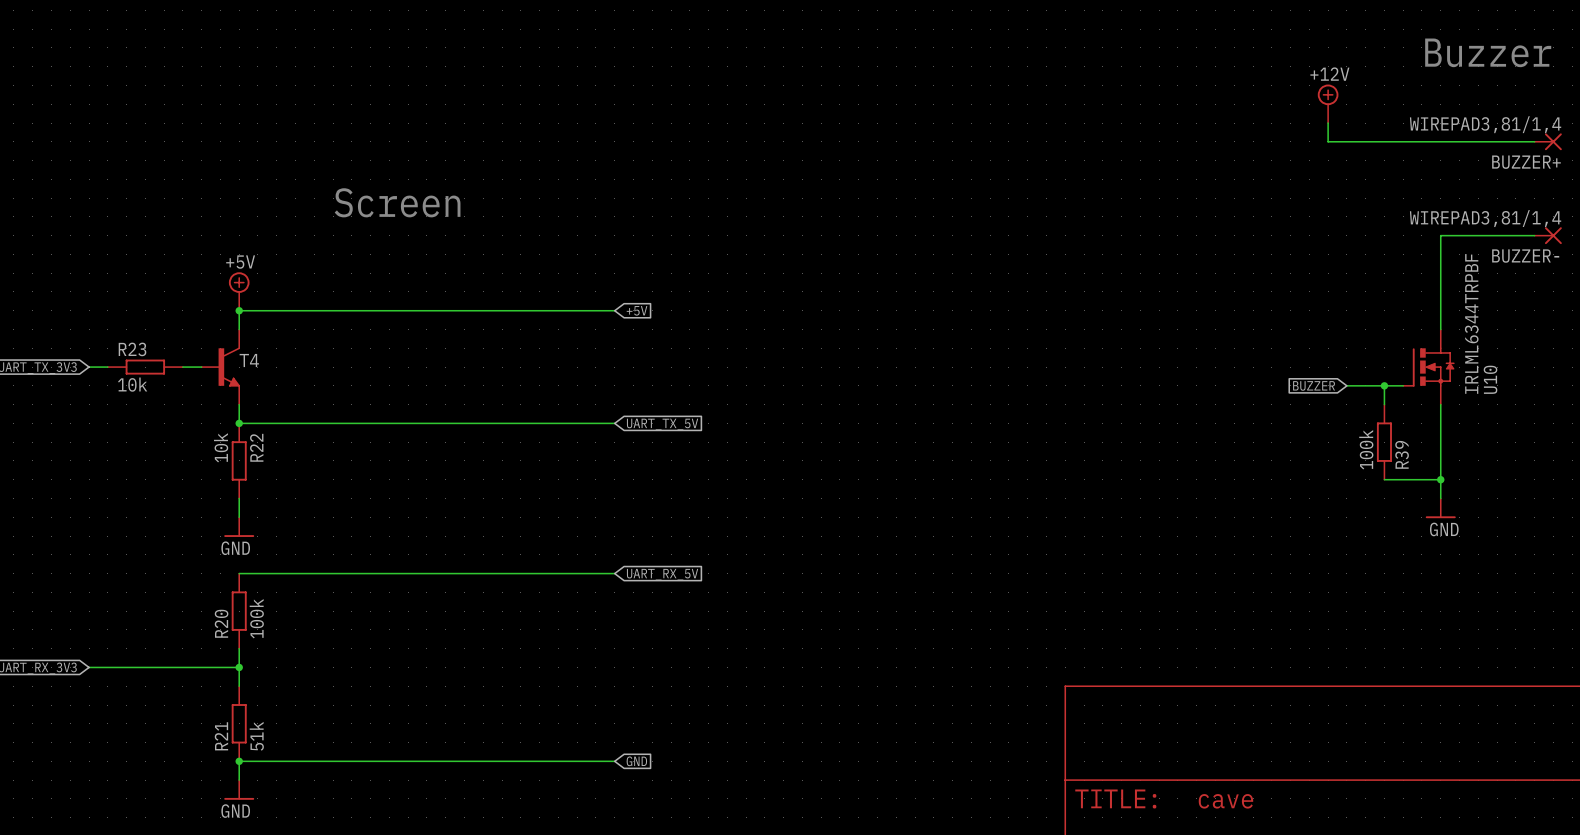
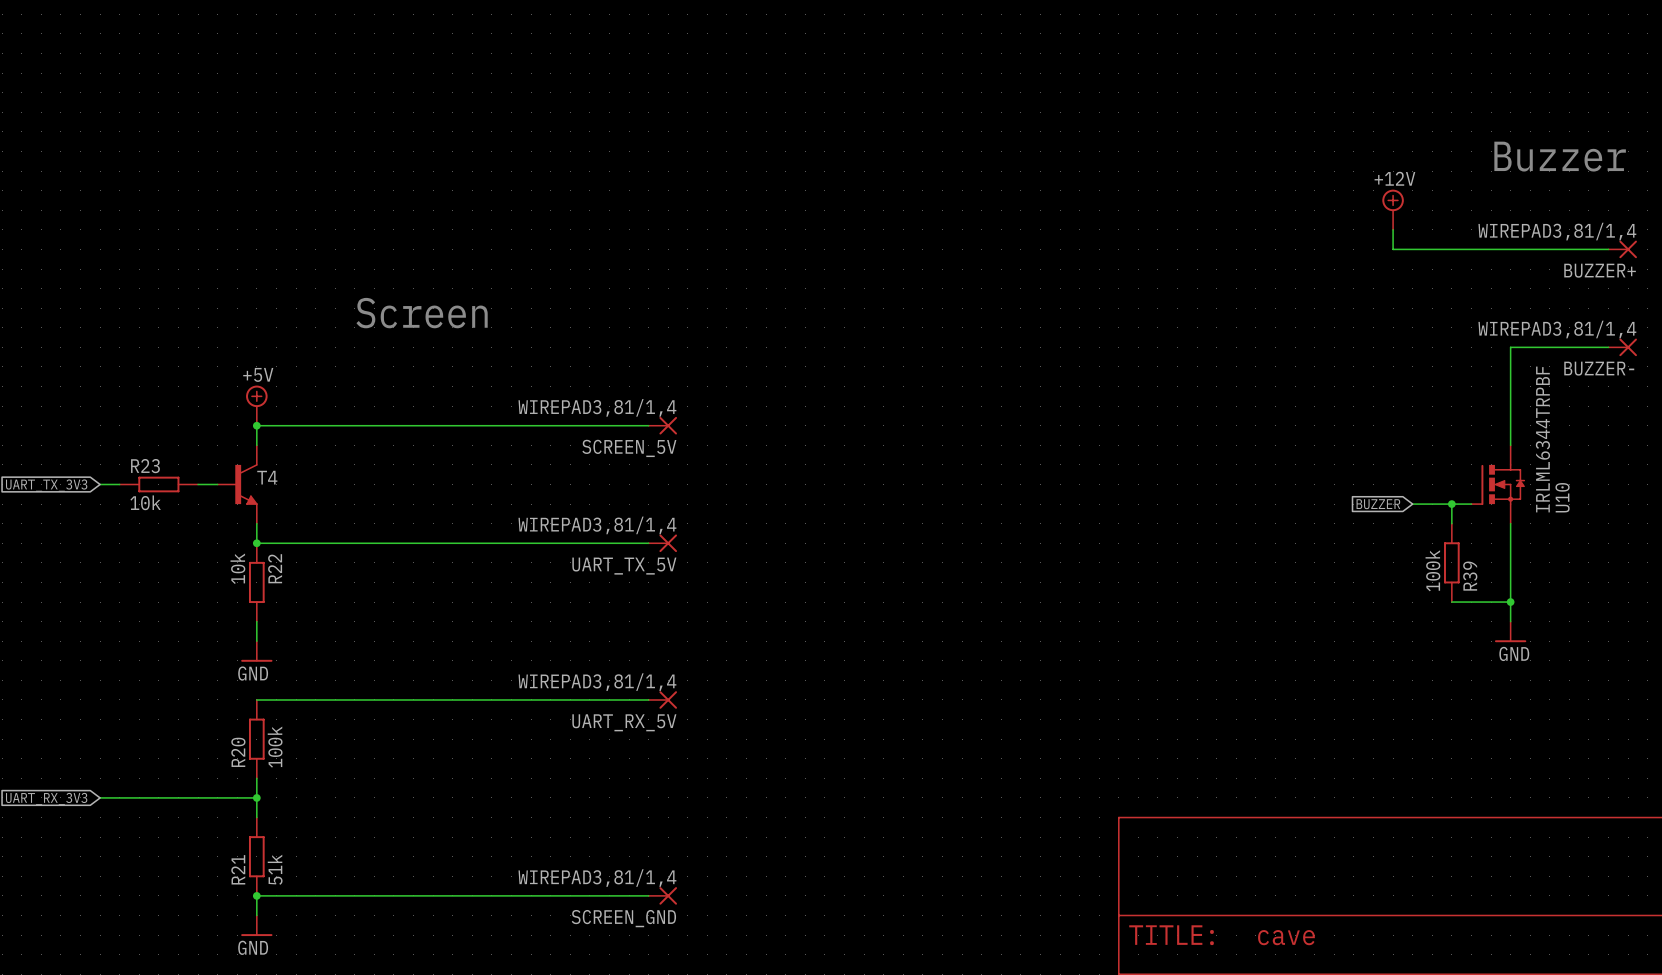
SCREEN_5V: none -> WIREPAD3,81/1,4 (662, 425)
global label: +5V (637, 310) -> none
UART_TX_5V: none -> WIREPAD3,81/1,4 (662, 543)
global label: UART_TX_5V (662, 424) -> none
UART_RX_5V: none -> WIREPAD3,81/1,4 (662, 699)
global label: UART_RX_5V (662, 574) -> none
SCREEN_GND: none -> WIREPAD3,81/1,4 (662, 895)
global label: GND (636, 761) -> none

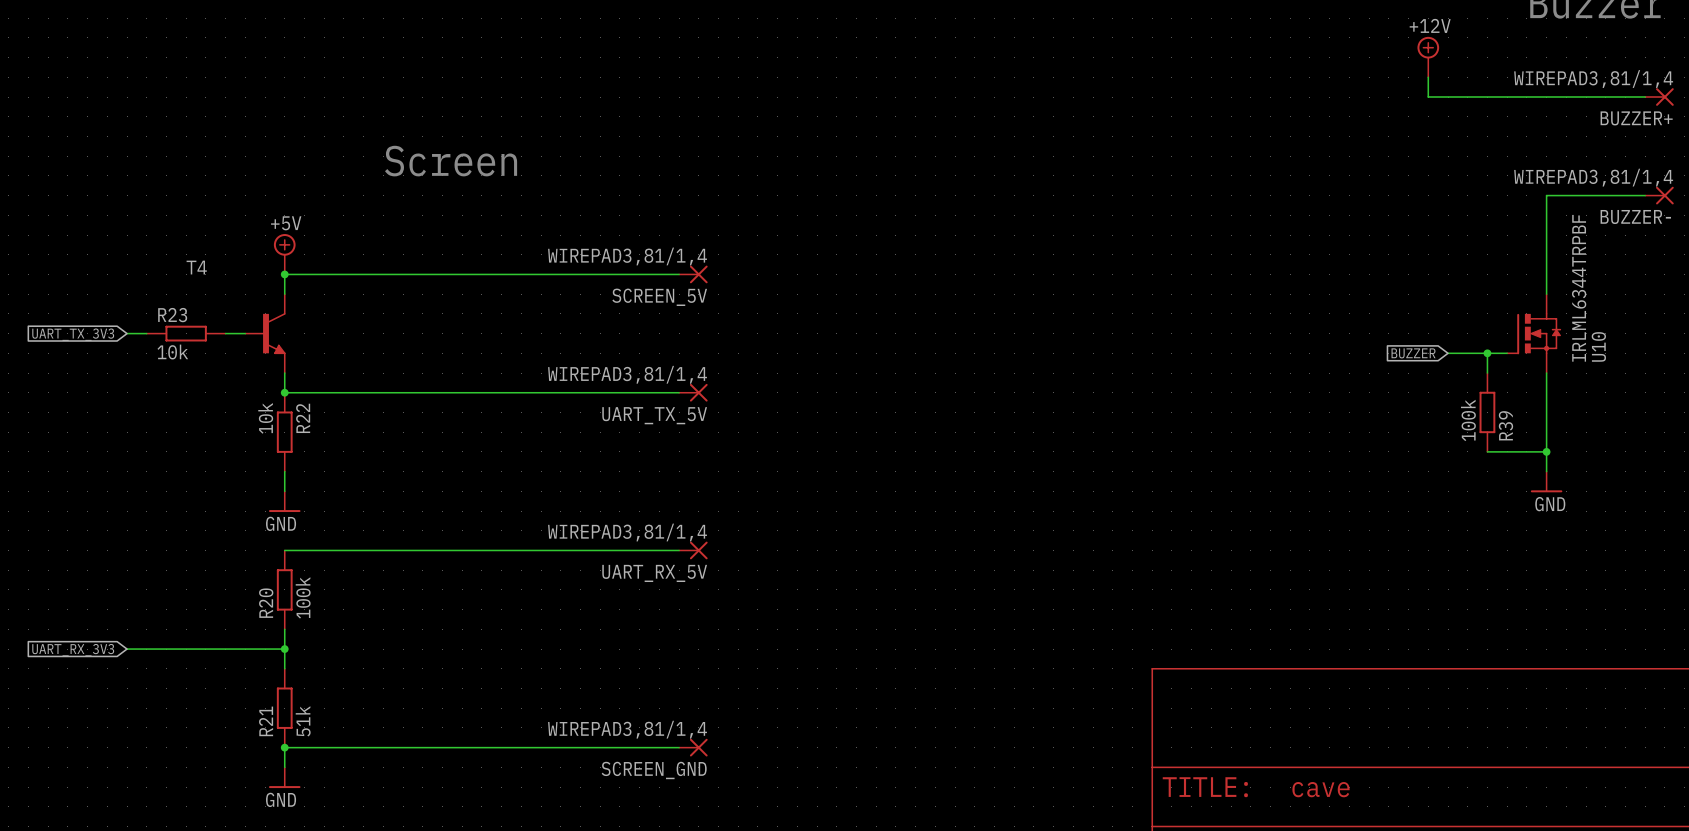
T4 name position: T4 (267, 477) -> T4 (196, 267)

